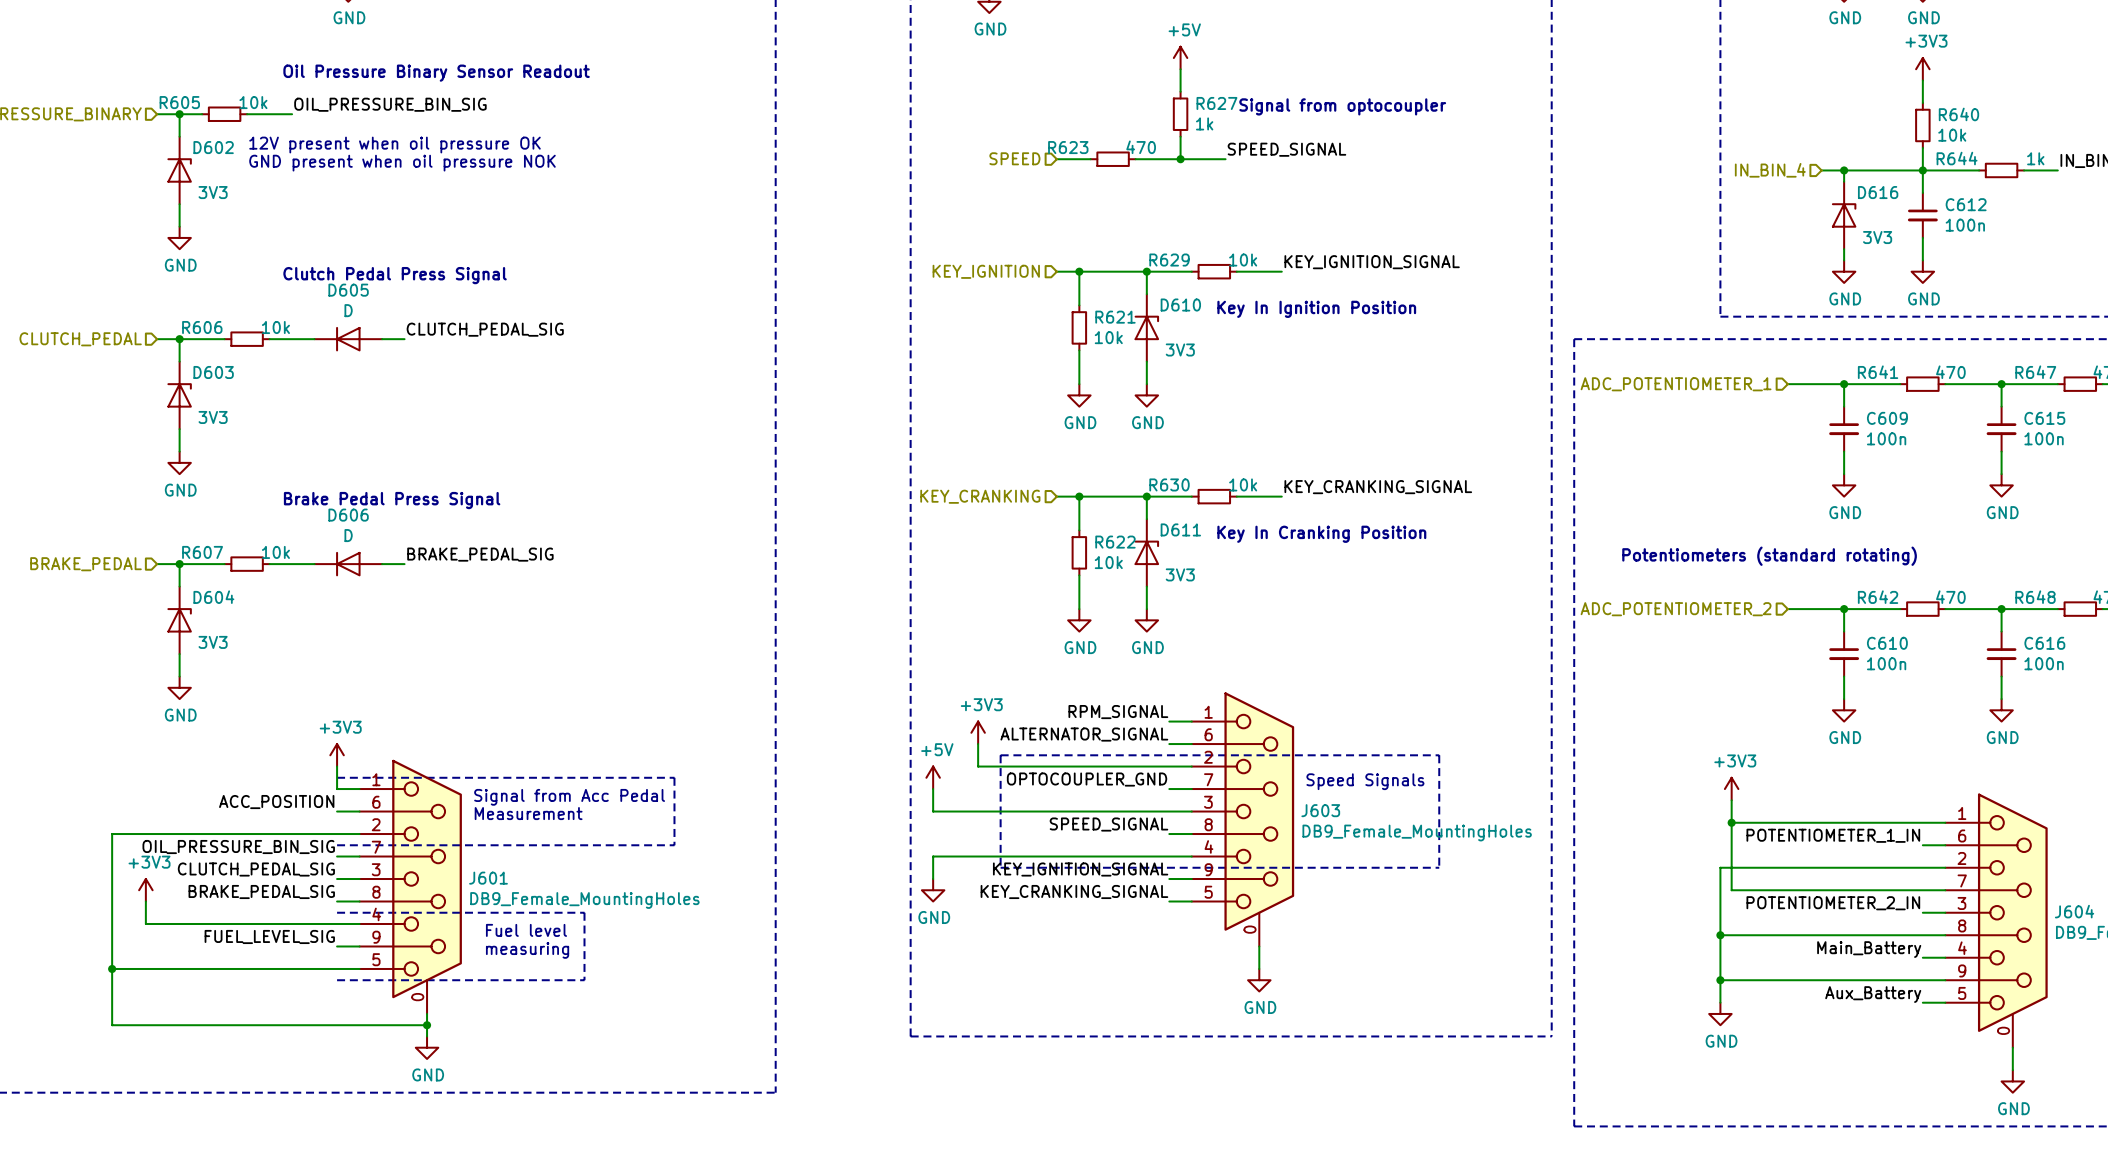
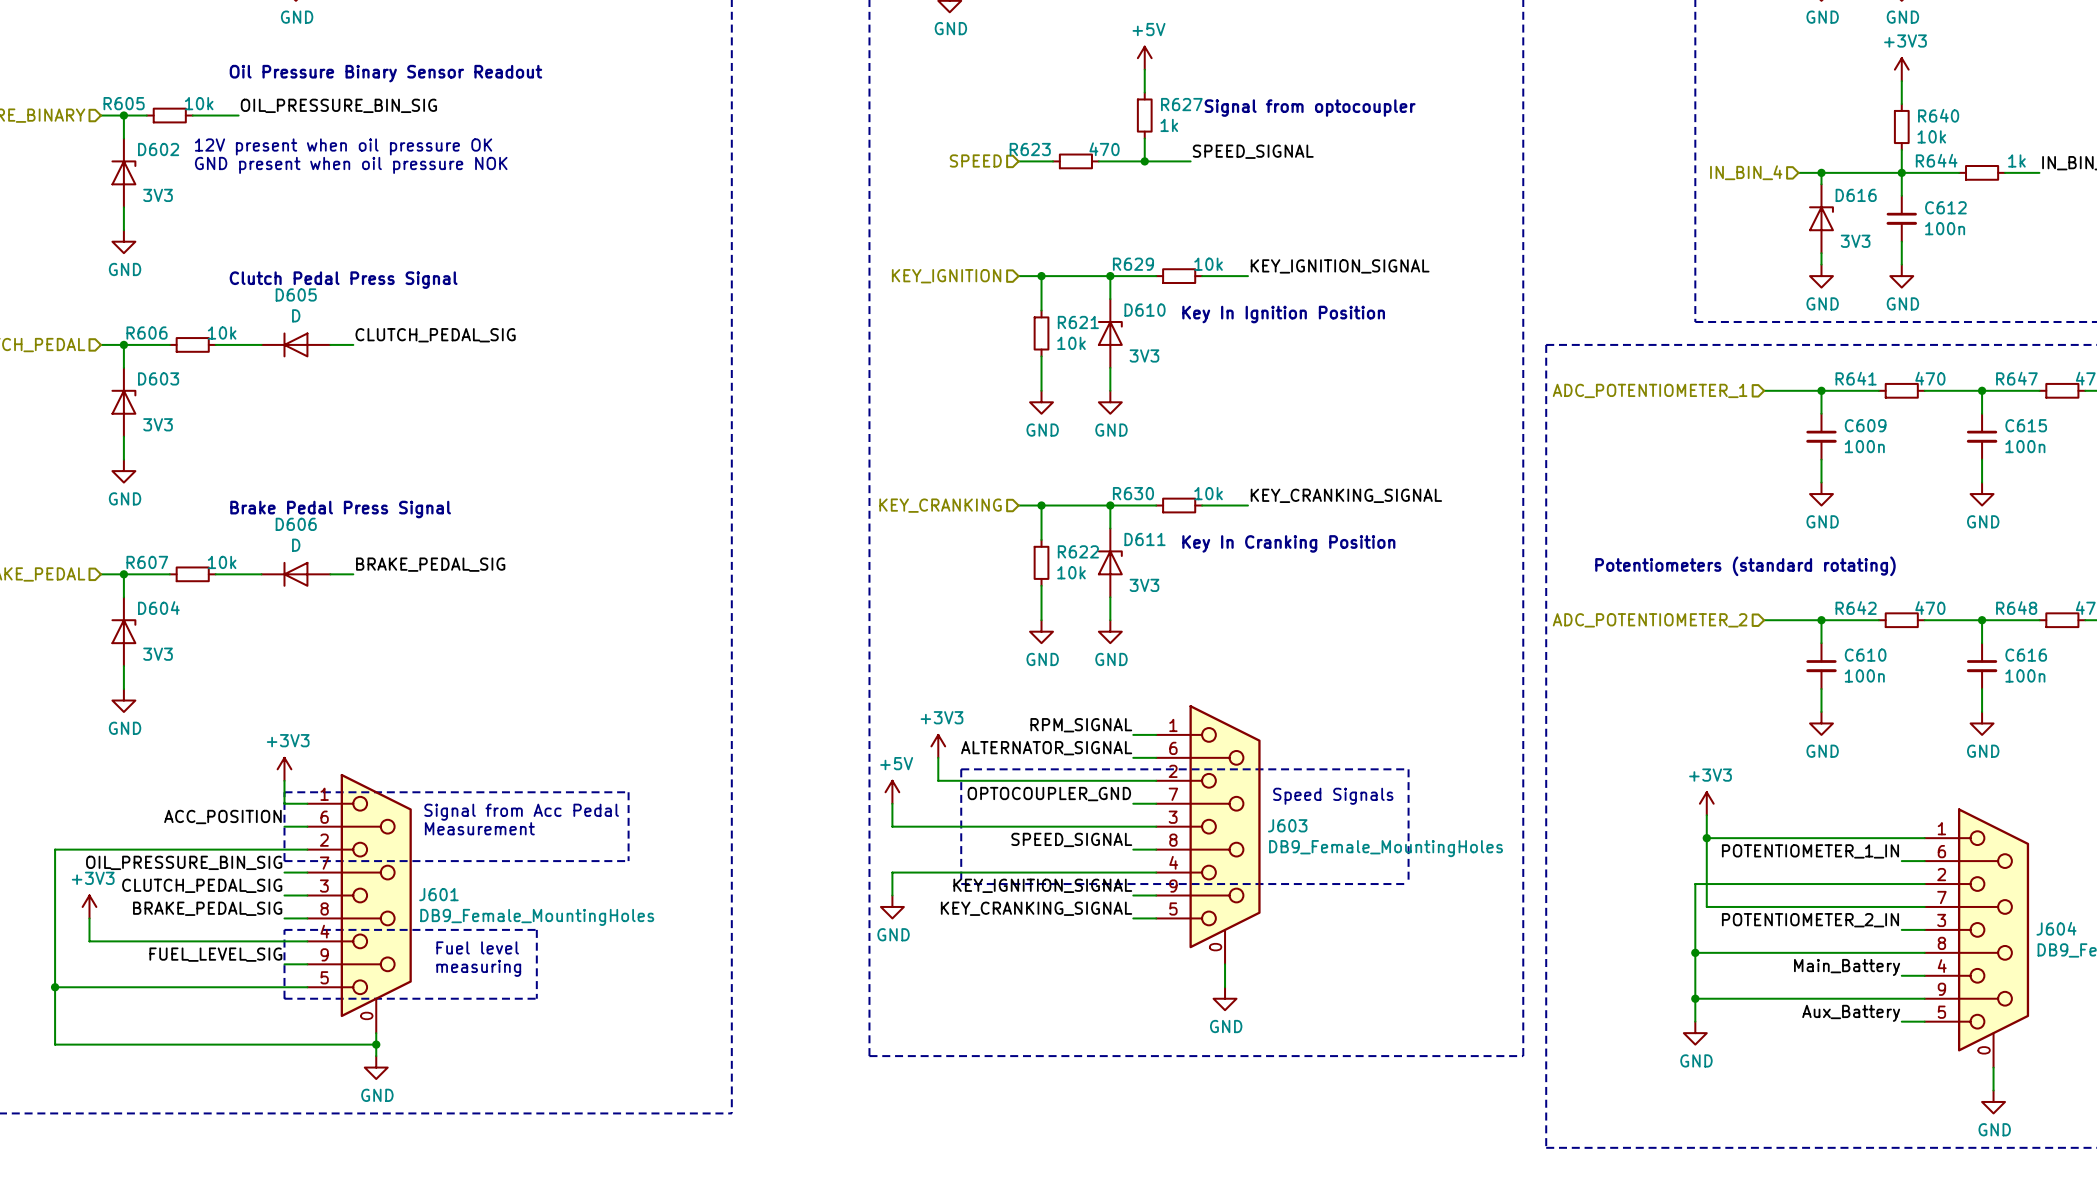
line: none -> (284, 792) (284, 861)
line: none -> (284, 929) (284, 998)

